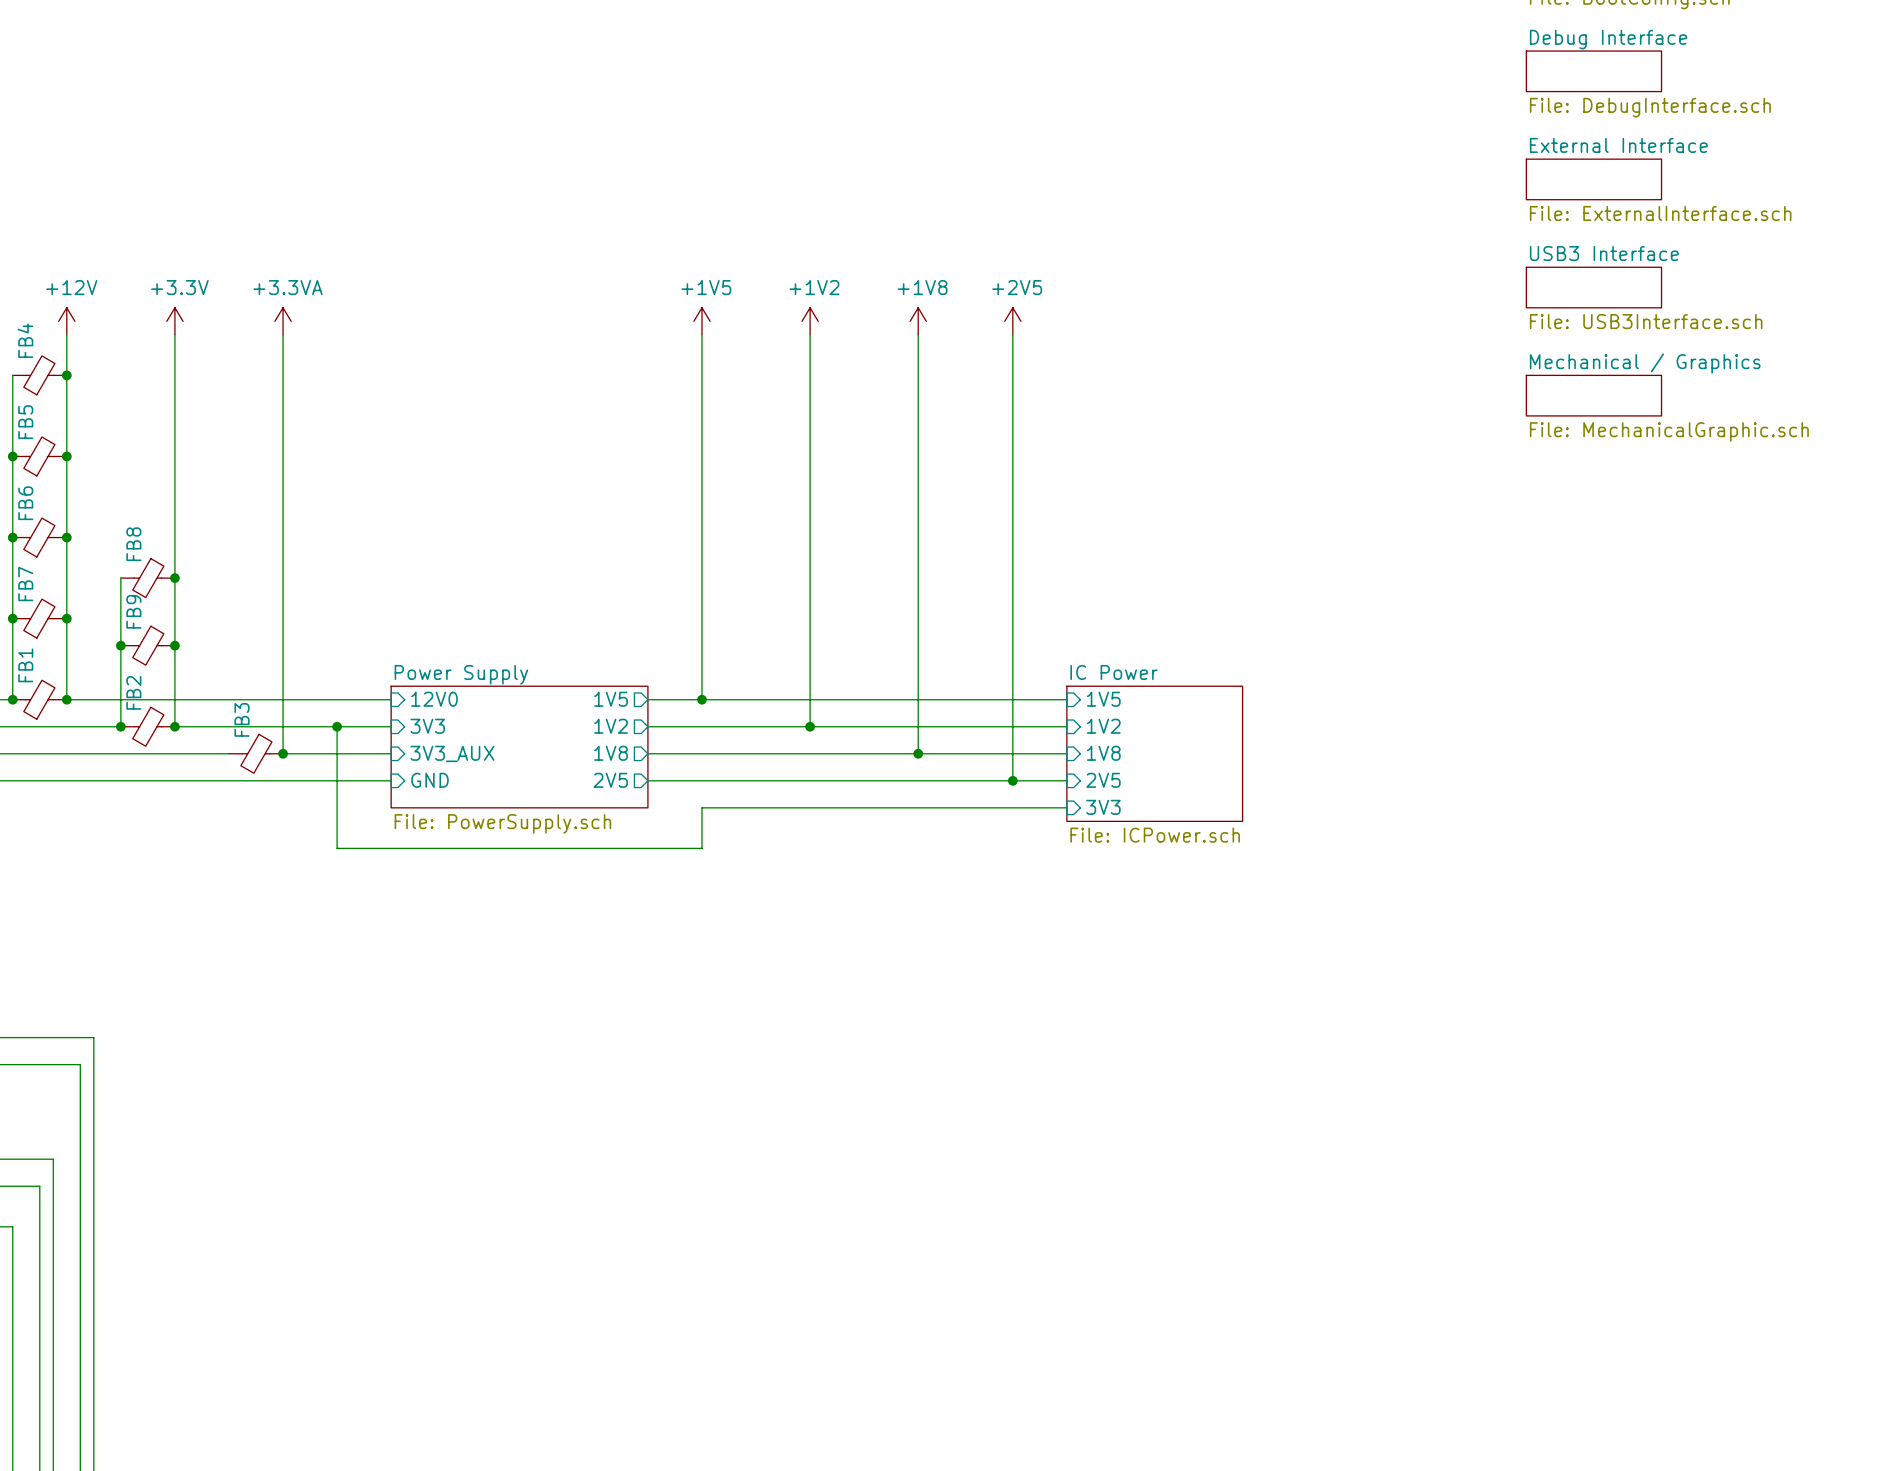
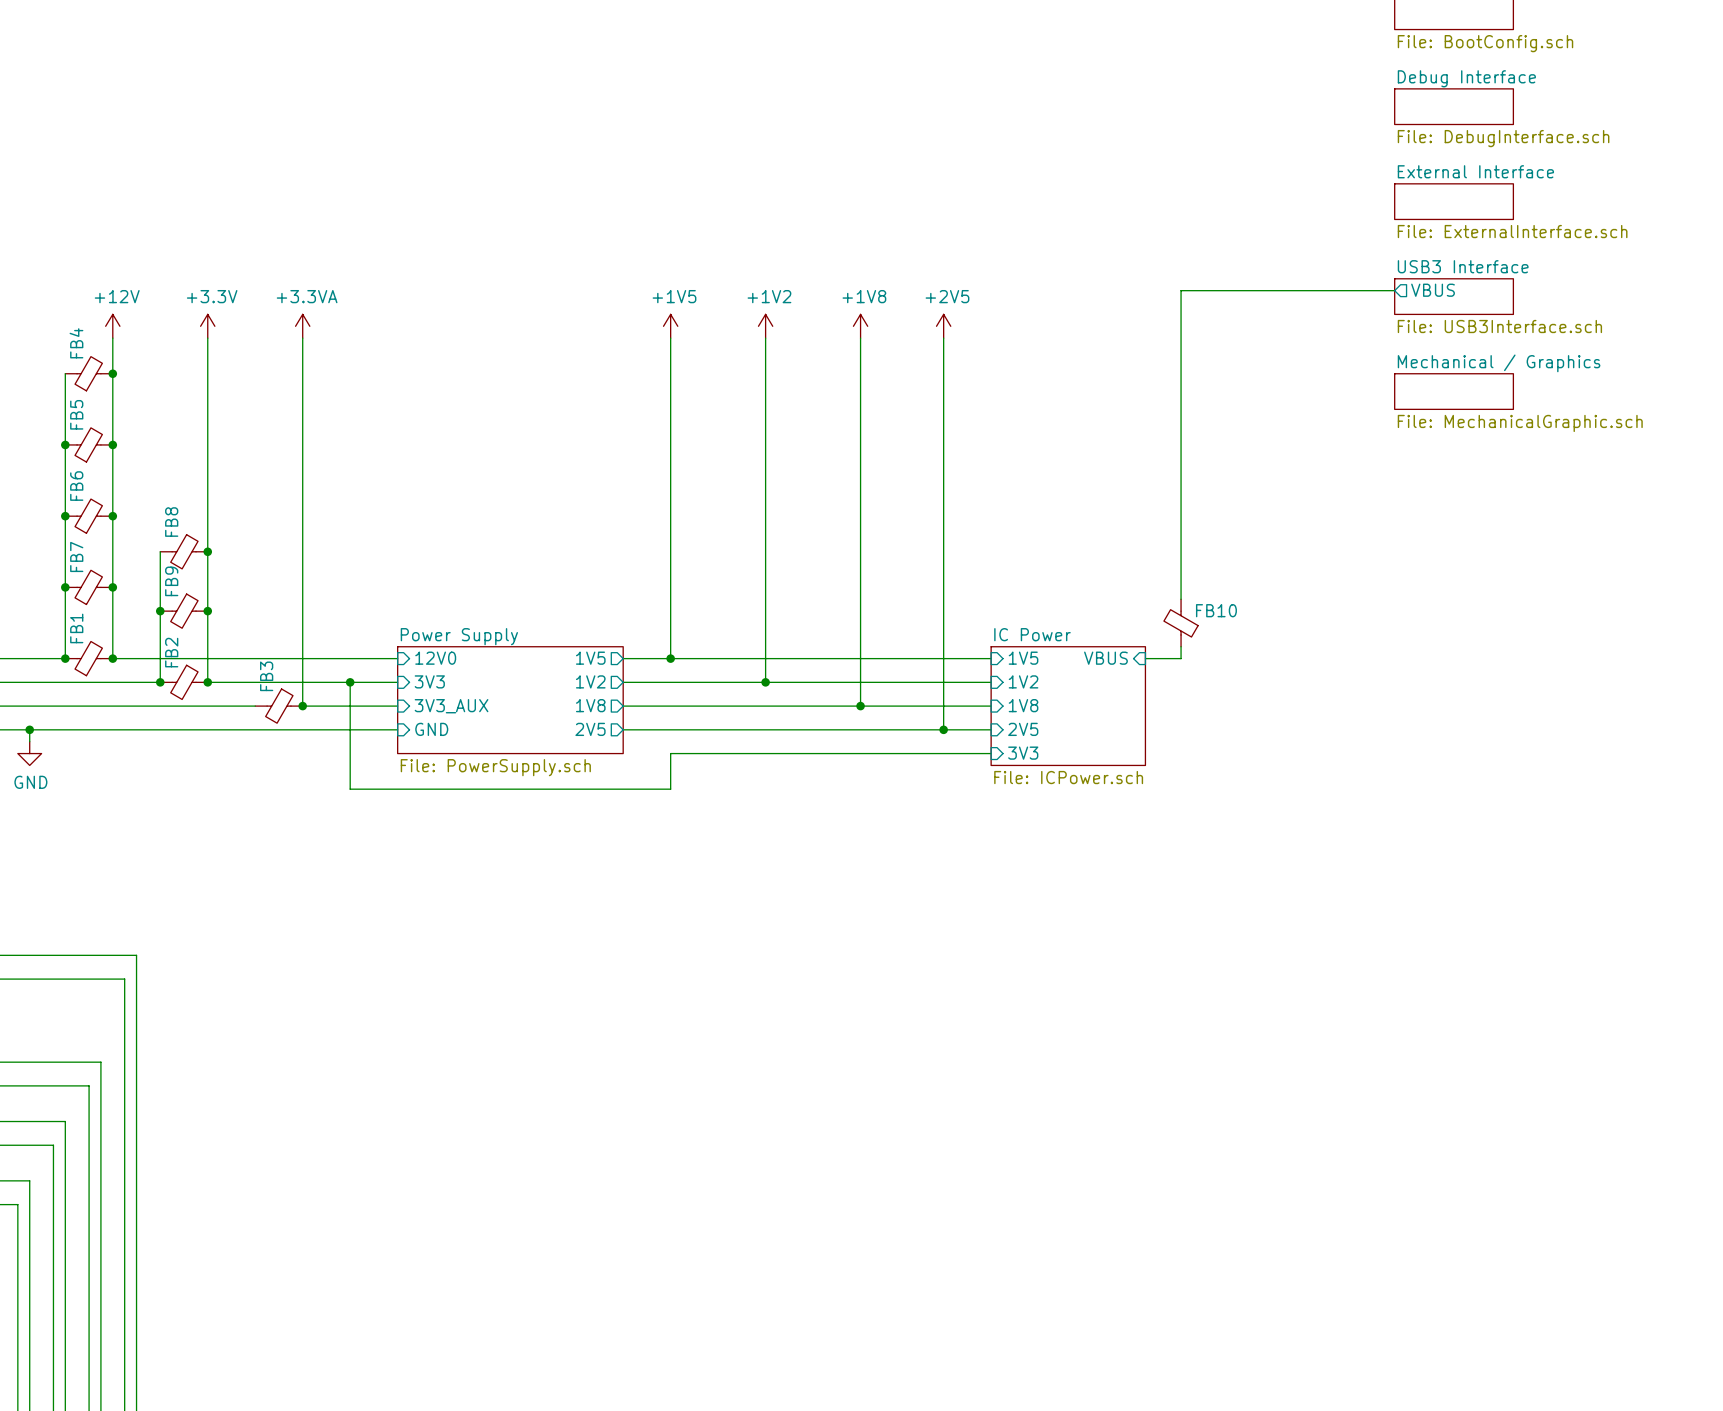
wire: none -> (1394, 290) (1181, 290) (1181, 599)
sheet pin: none -> VBUS (1433, 290)
FB10: none -> (1181, 623)
wire: none -> (1181, 646) (1181, 658) (1145, 658)
sheet pin: none -> VBUS (1105, 658)

